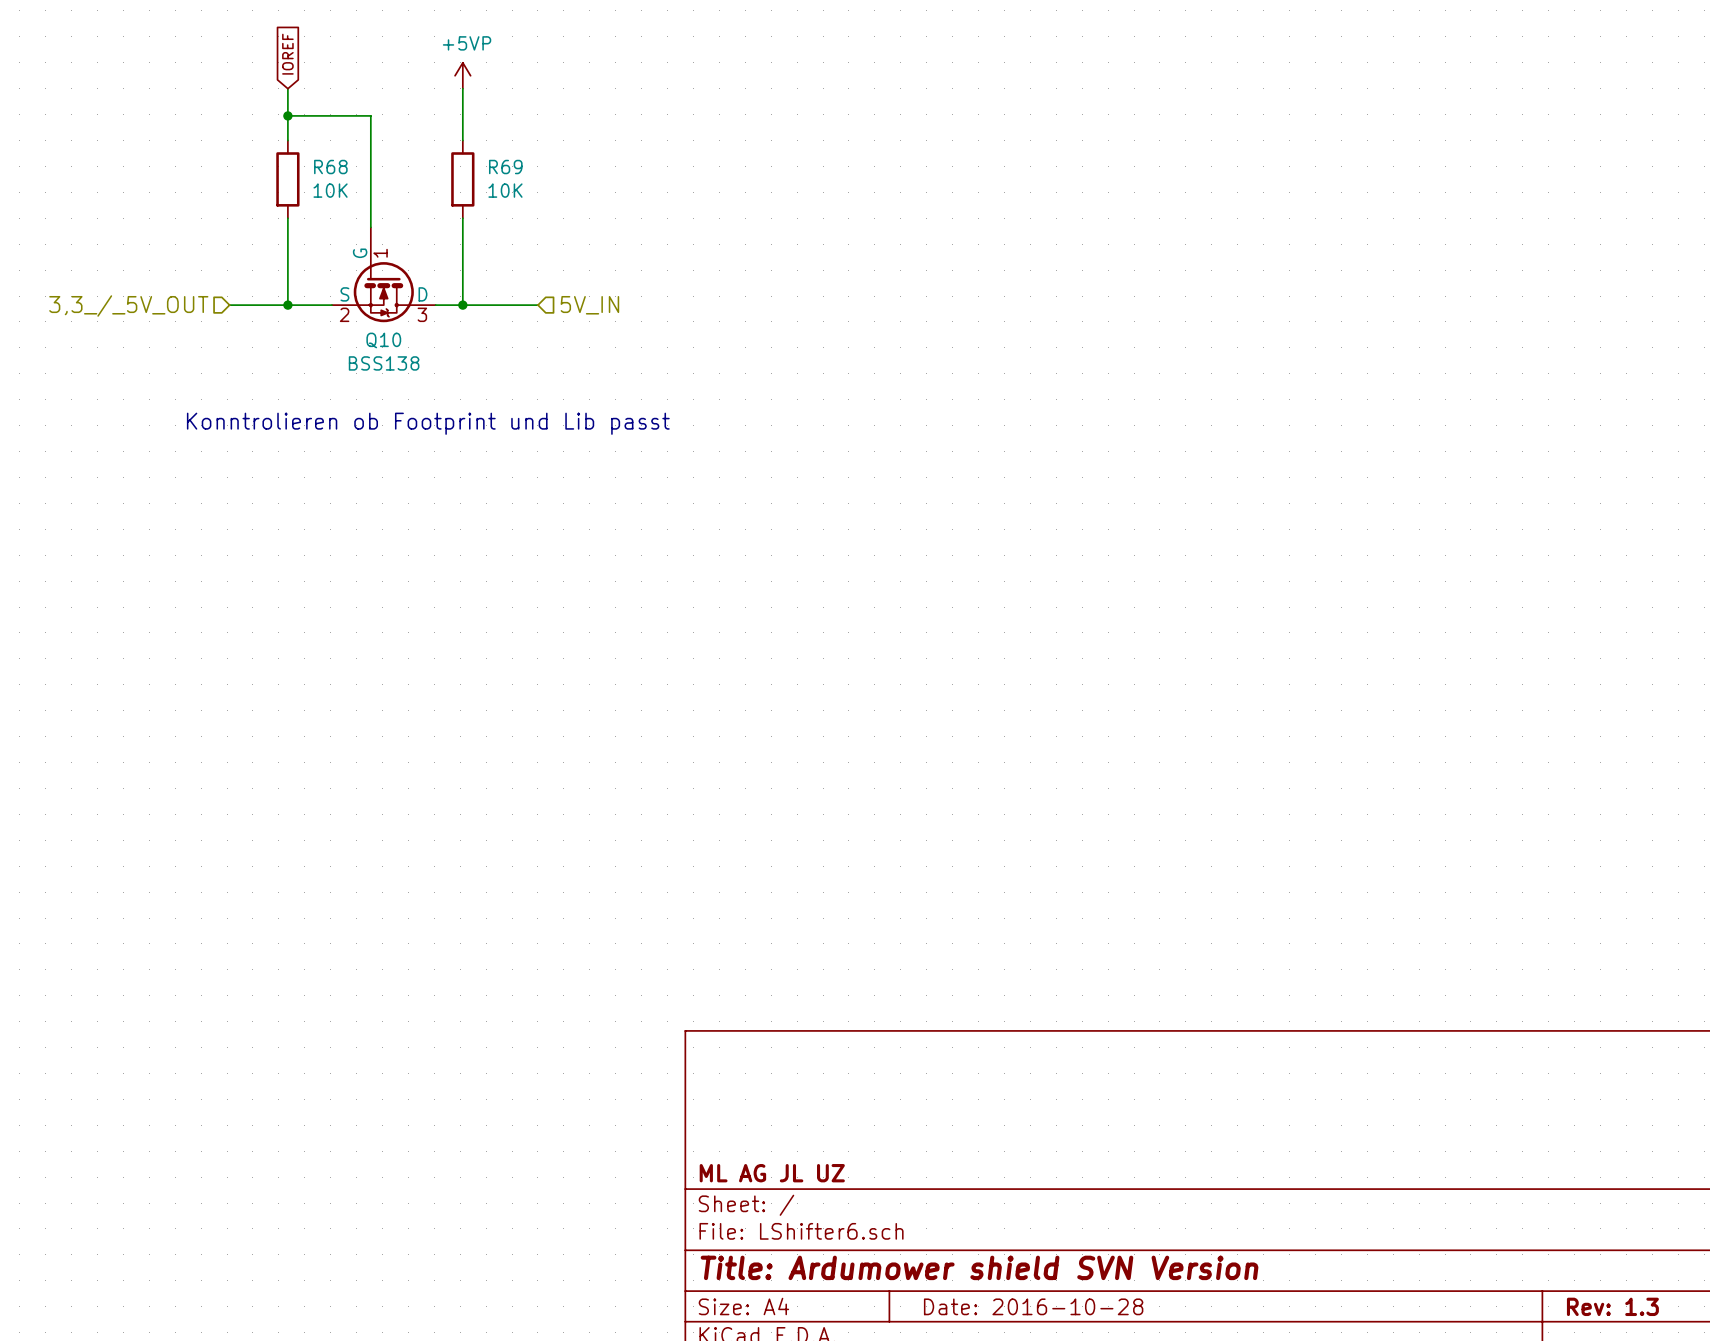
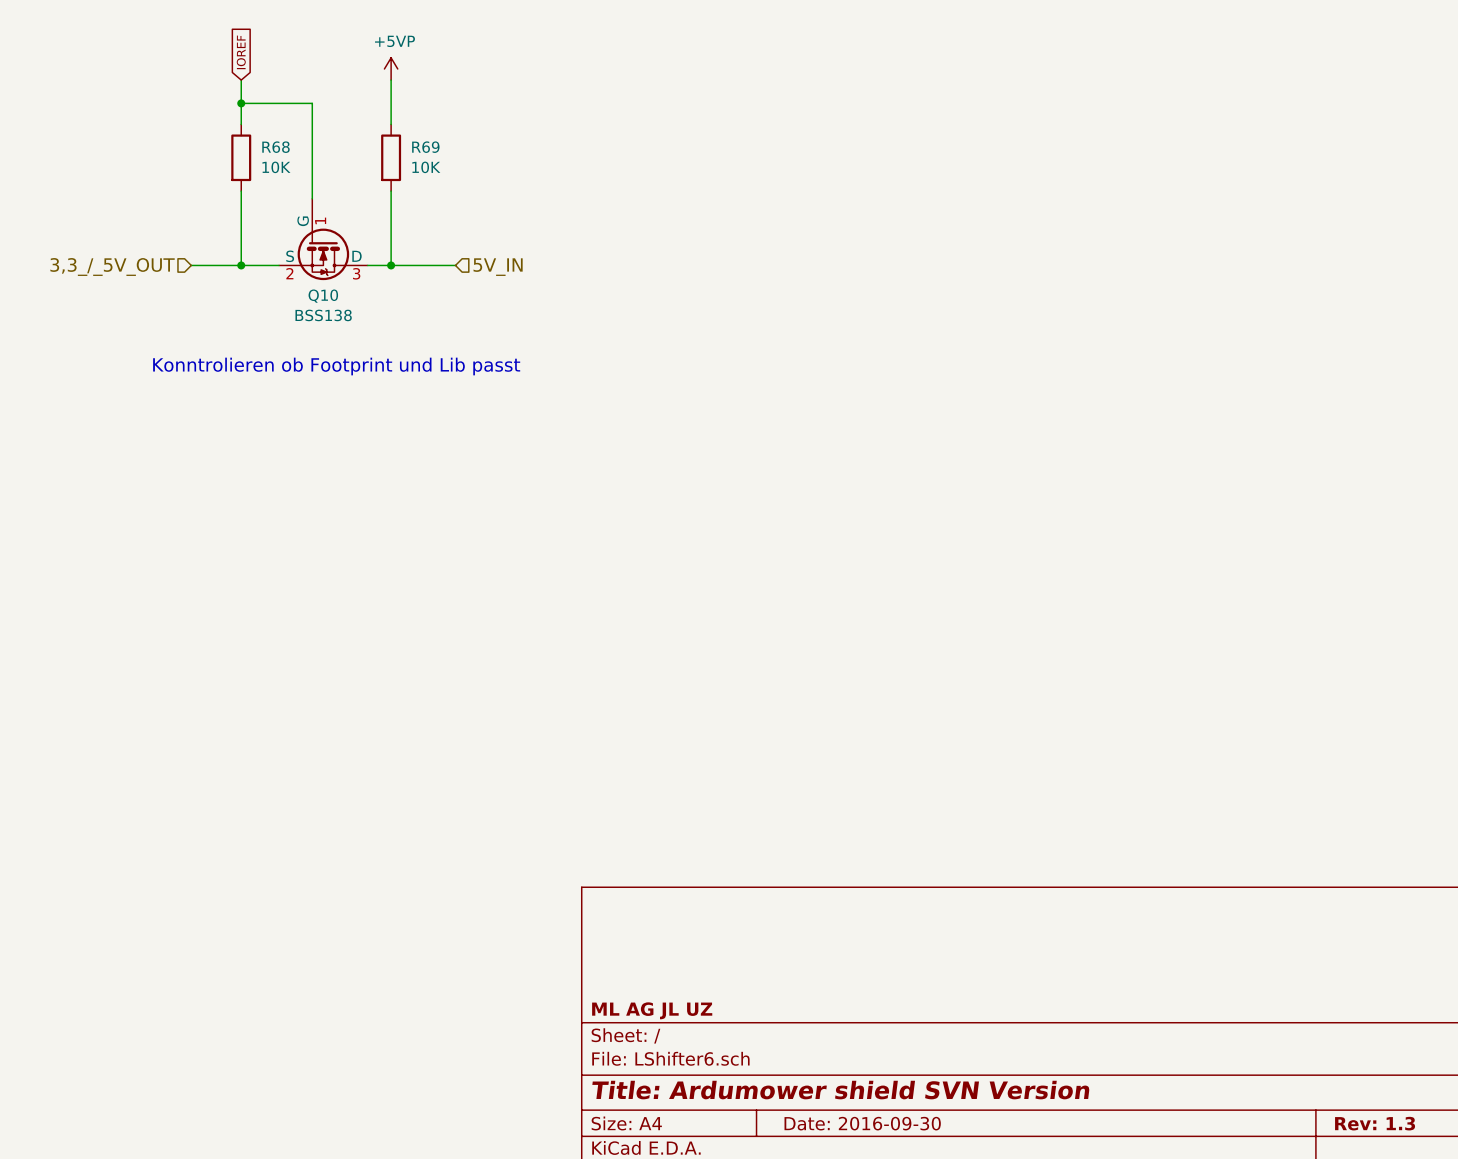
title block: Date: 2016-10-28 (1033, 1306) -> Date: 2016-09-30 (862, 1123)

